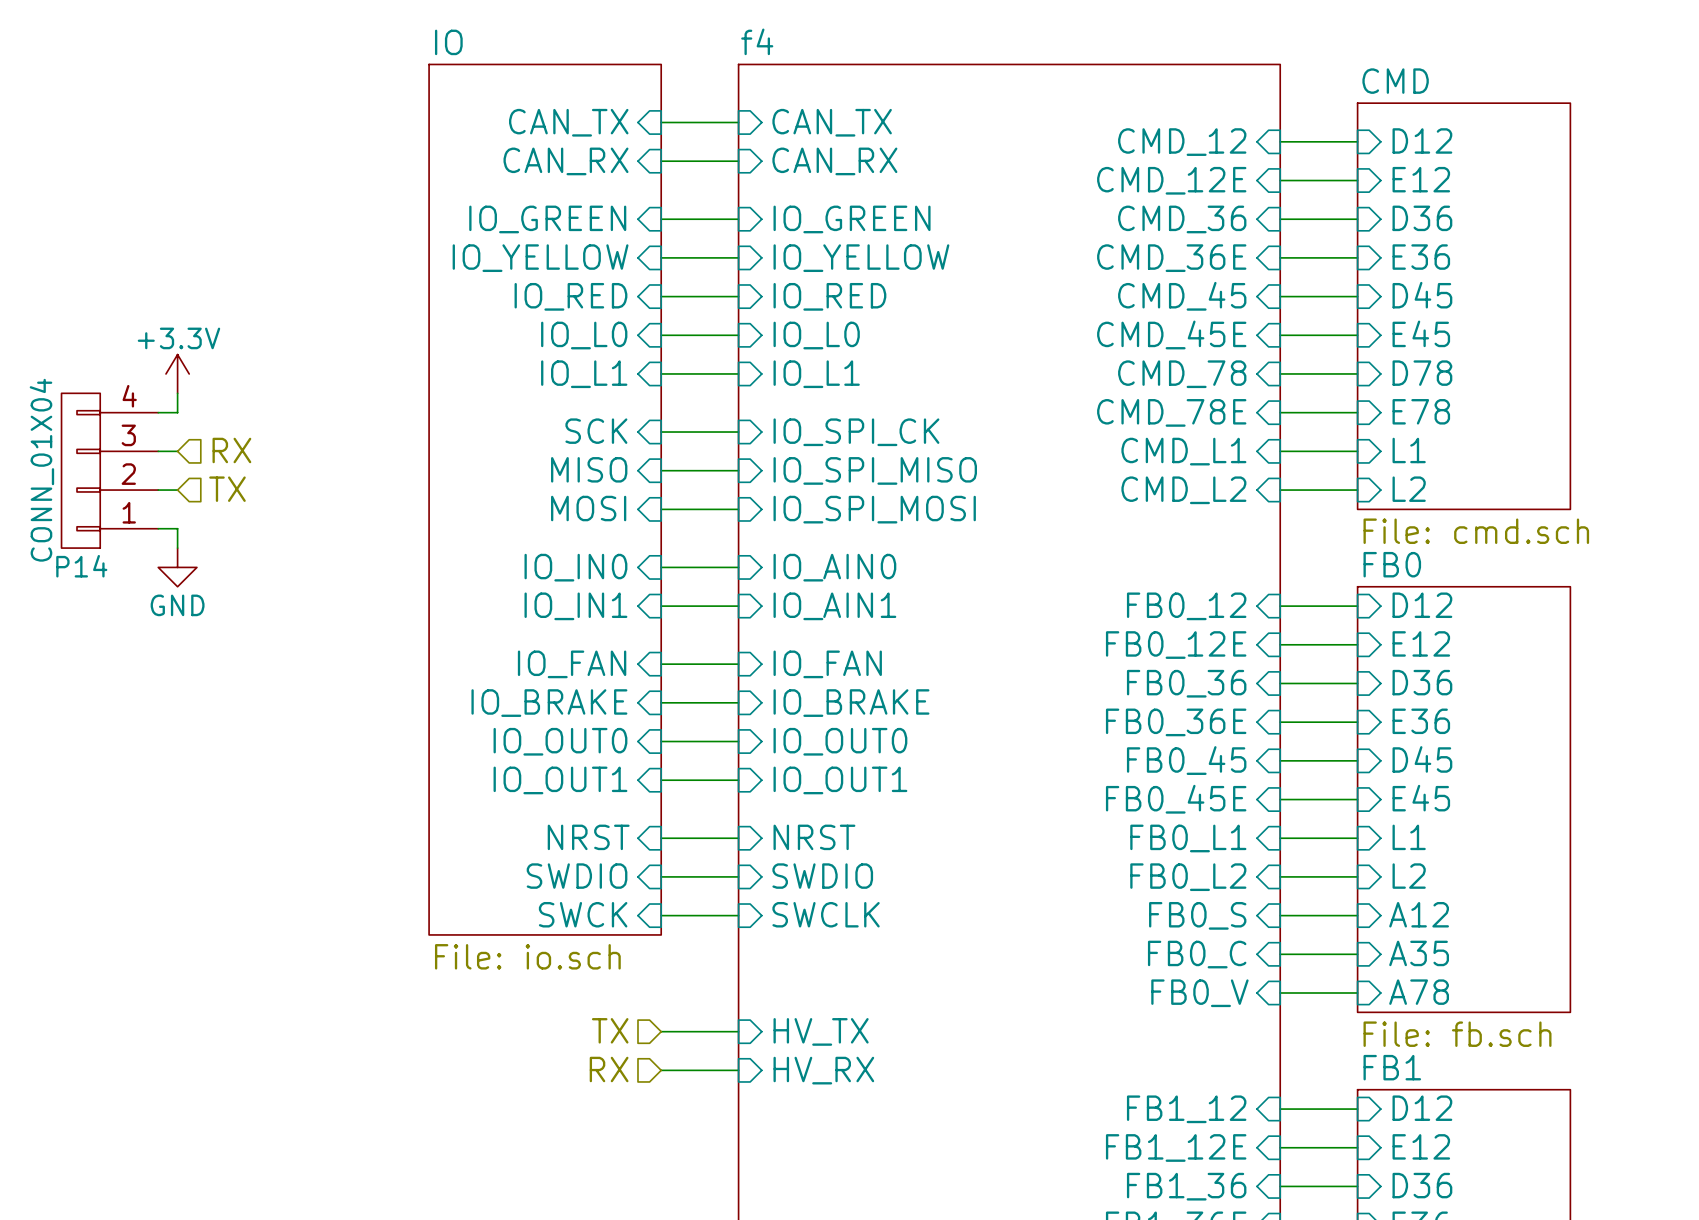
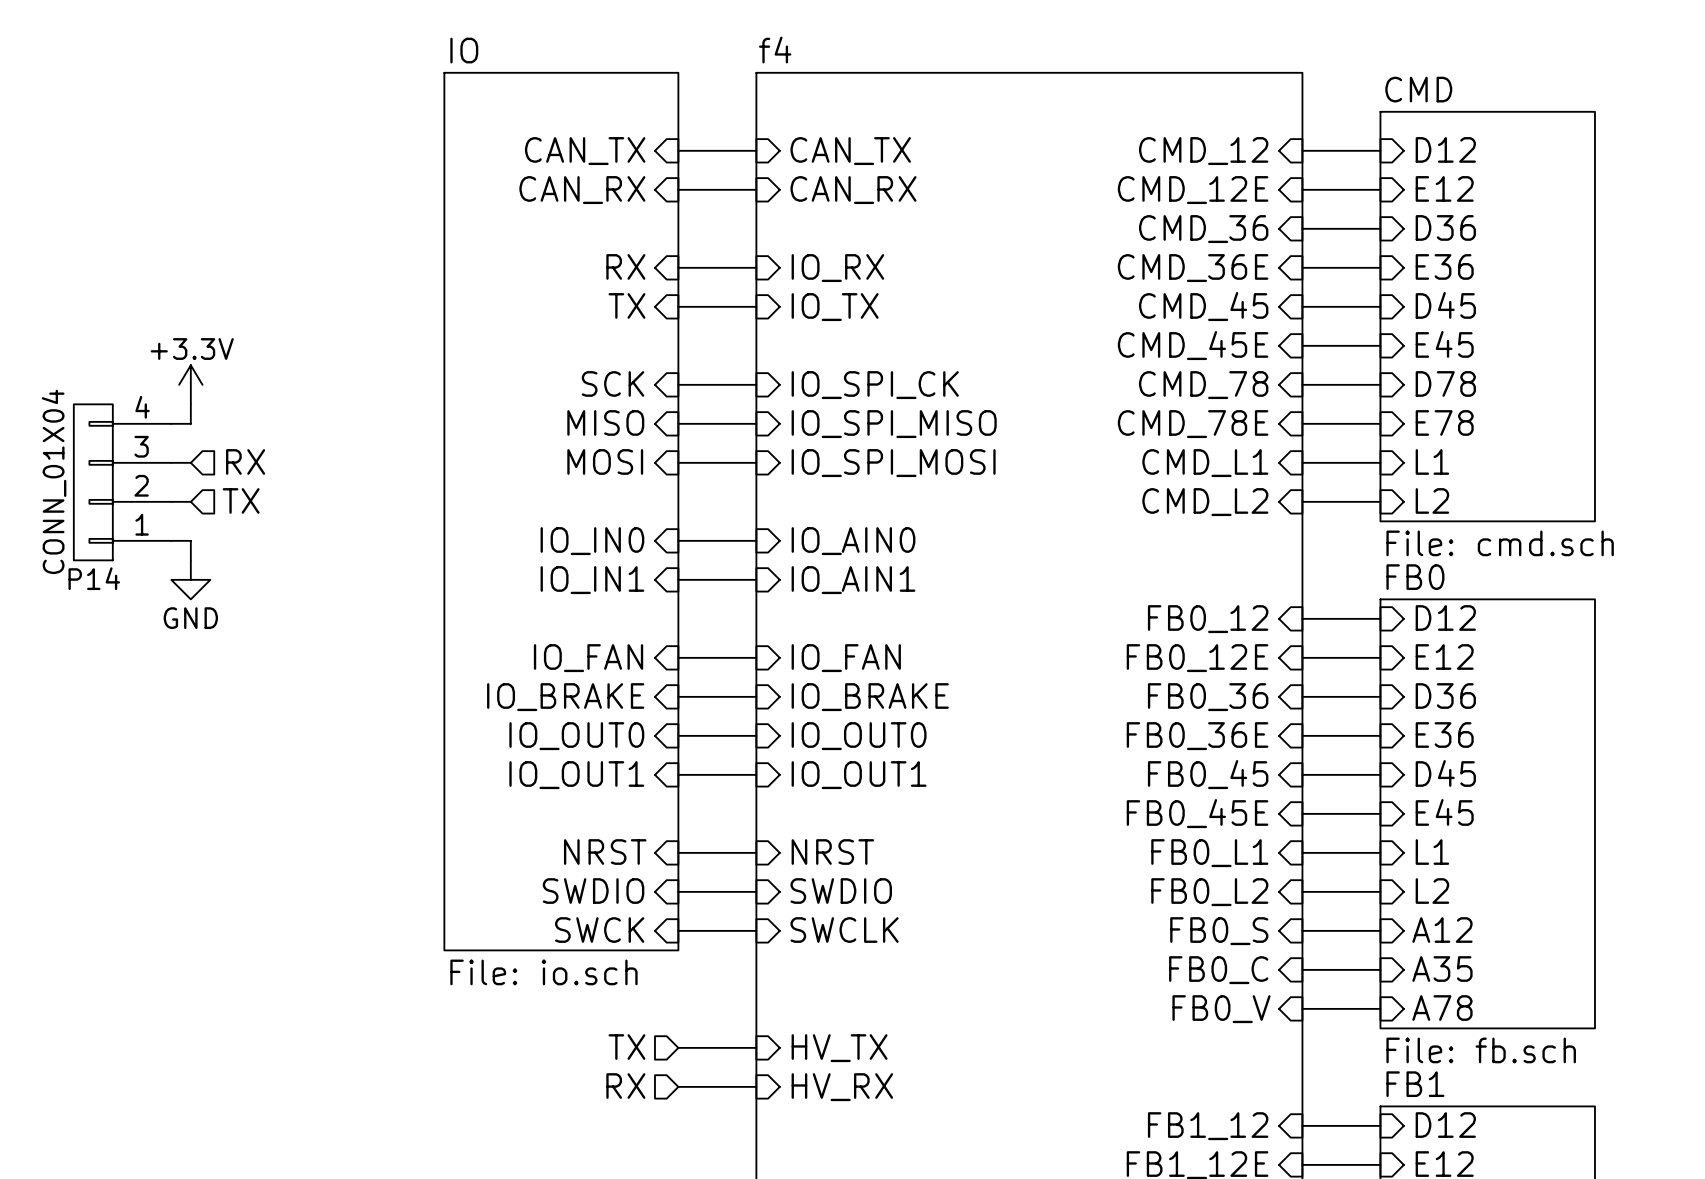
sheet pin position: CAN_TX (568, 122) -> CAN_TX (585, 151)
wire: (661, 122) (738, 122) -> (678, 150) (756, 150)
sheet pin position: CAN_TX (832, 122) -> CAN_TX (850, 151)
sheet pin position: CAN_RX (565, 161) -> CAN_RX (582, 190)
wire: (661, 161) (738, 161) -> (678, 189) (756, 189)
sheet pin position: CAN_RX (834, 161) -> CAN_RX (853, 190)
sheet pin: IO_GREEN (547, 219) -> none
wire: (661, 219) (738, 219) -> none
sheet pin: IO_GREEN (852, 219) -> none
sheet pin: IO_YELLOW (540, 258) -> RX (625, 266)
sheet pin: IO_YELLOW (861, 258) -> IO_RX (837, 268)
sheet pin: IO_RED (570, 296) -> TX (626, 305)
sheet pin: IO_RED (829, 296) -> IO_TX (835, 307)
sheet pin: IO_L0 (584, 335) -> none
wire: (661, 335) (738, 335) -> none
sheet pin: IO_L0 (816, 335) -> none
sheet pin: IO_L1 (584, 374) -> SCK (613, 383)
sheet pin: IO_L1 (816, 374) -> IO_SPI_CK (875, 385)
sheet pin: SCK (596, 431) -> none
wire: (661, 432) (738, 432) -> (678, 423) (756, 423)
sheet pin: IO_SPI_CK (856, 432) -> none
sheet pin position: MISO (589, 469) -> MISO (605, 422)
wire: (661, 470) (738, 470) -> (678, 462) (756, 462)
sheet pin position: IO_SPI_MISO (875, 470) -> IO_SPI_MISO (894, 424)
sheet pin position: MOSI (588, 508) -> MOSI (605, 461)
wire: (661, 509) (738, 509) -> (678, 540) (756, 540)
sheet pin position: IO_SPI_MOSI (874, 509) -> IO_SPI_MOSI (893, 463)
sheet pin: none -> IO_IN0 (592, 541)
sheet pin: none -> IO_AIN0 (853, 541)
sheet pin: IO_IN0 (575, 567) -> IO_IN1 (592, 580)
sheet pin: IO_AIN0 (834, 567) -> IO_AIN1 (853, 580)
sheet pin: IO_IN1 (575, 606) -> none
wire: (661, 606) (738, 606) -> none
sheet pin: IO_AIN1 (834, 606) -> none
sheet pin position: IO_FAN (572, 664) -> IO_FAN (588, 658)
wire: (661, 664) (738, 664) -> (678, 657) (756, 657)
sheet pin position: IO_FAN (827, 664) -> IO_FAN (846, 658)
wire: (661, 702) (738, 702) -> (678, 696) (756, 696)
sheet pin position: IO_BRAKE (549, 703) -> IO_BRAKE (565, 697)
sheet pin position: IO_BRAKE (851, 703) -> IO_BRAKE (870, 697)
sheet pin position: IO_OUT0 (560, 741) -> IO_OUT0 (576, 736)
wire: (661, 741) (738, 741) -> (678, 735) (756, 735)
sheet pin position: IO_OUT0 (840, 741) -> IO_OUT0 (859, 736)
sheet pin position: IO_OUT1 (560, 780) -> IO_OUT1 (576, 775)
wire: (661, 780) (738, 780) -> (678, 774) (756, 774)
sheet pin position: IO_OUT1 (840, 780) -> IO_OUT1 (859, 775)

